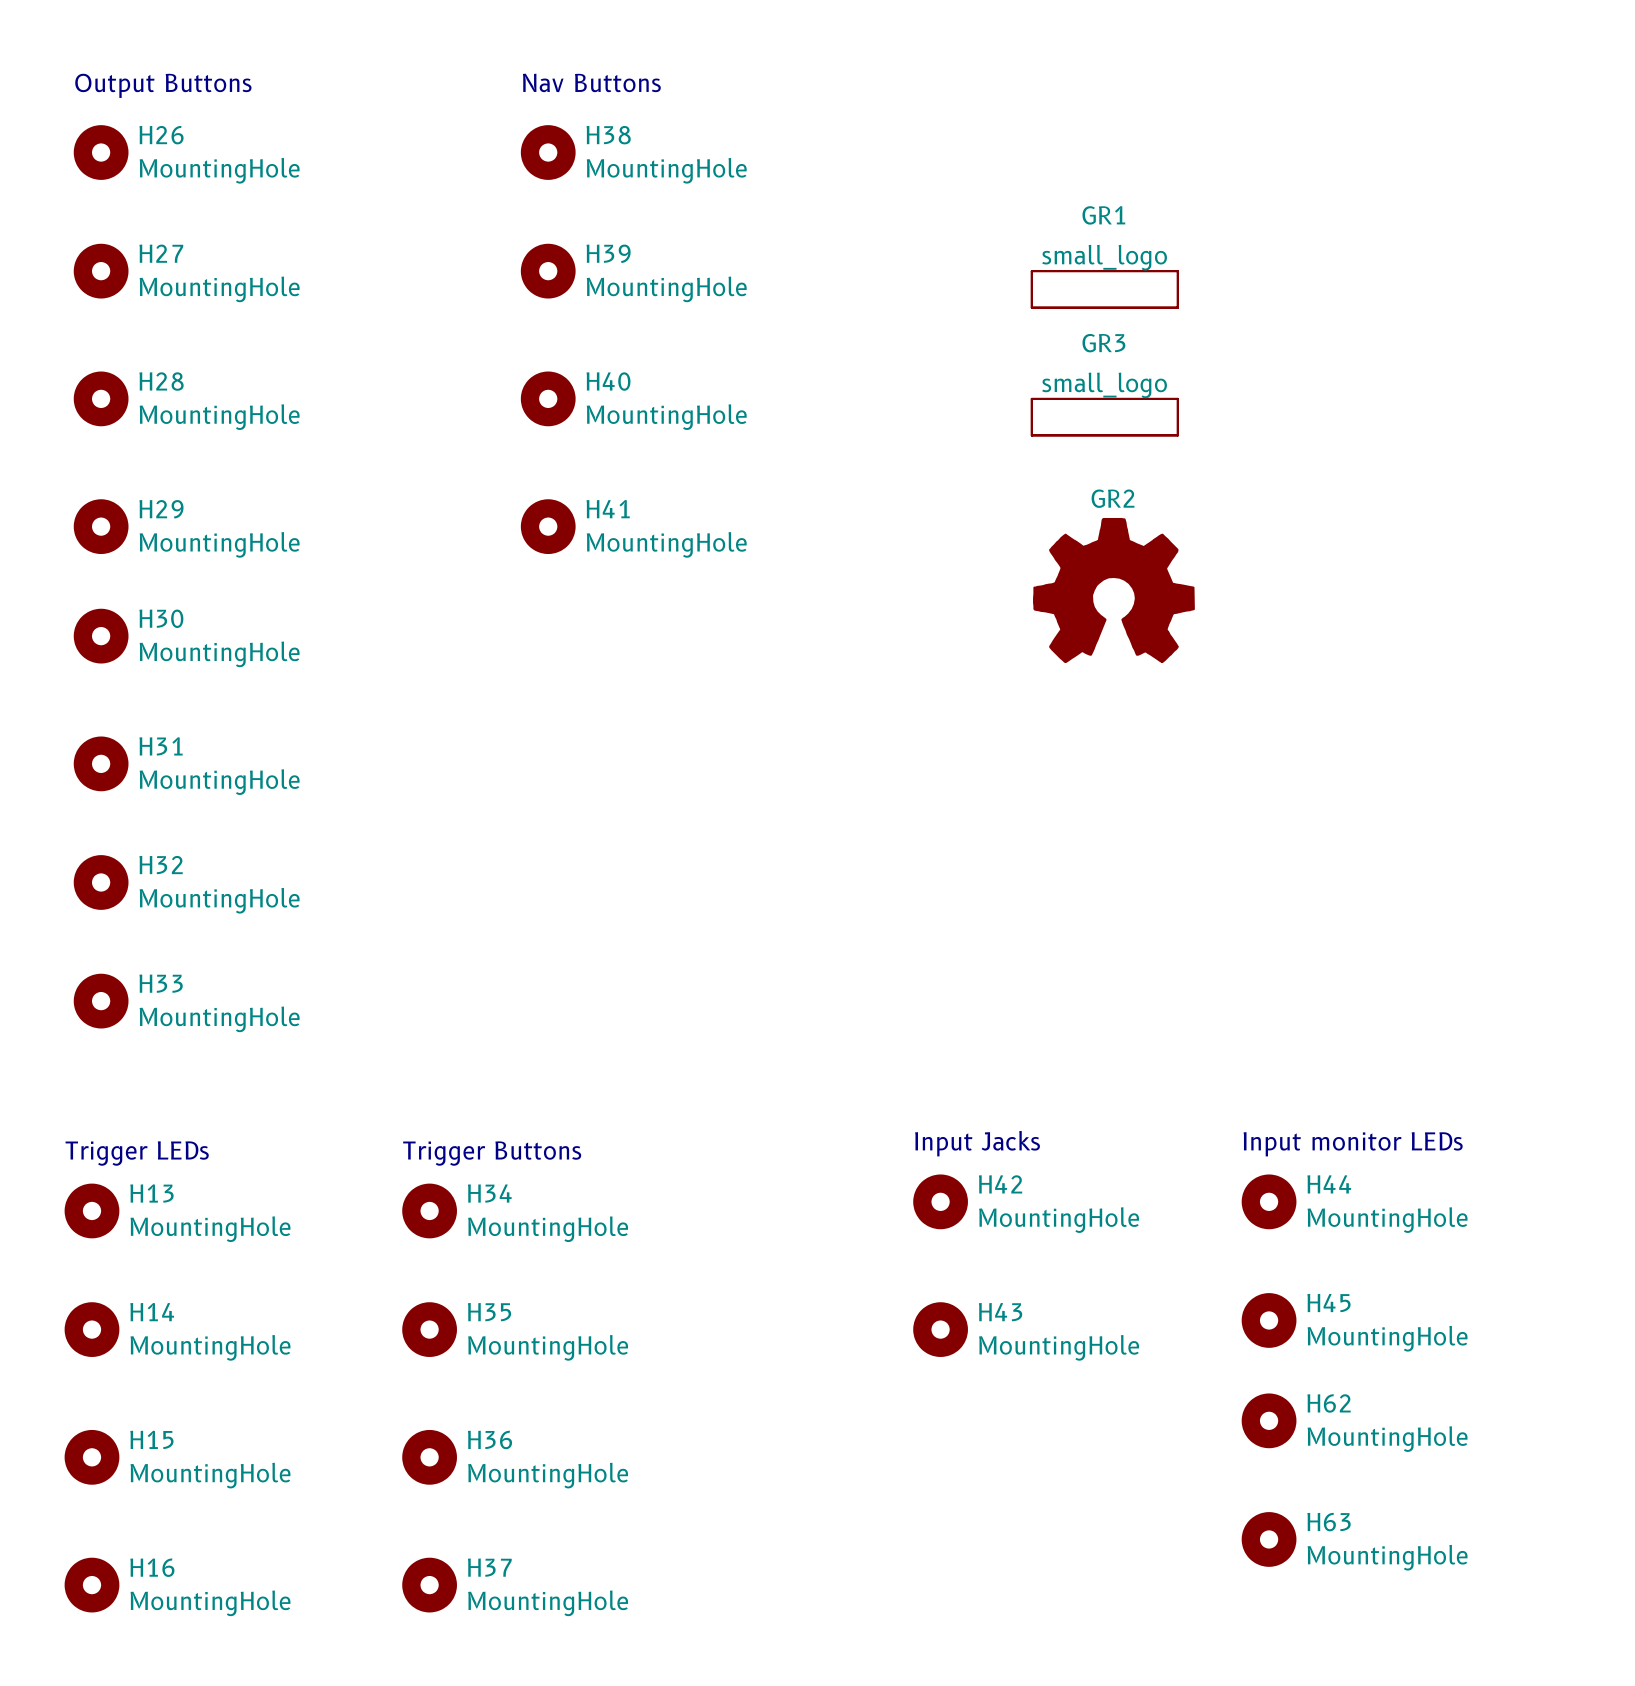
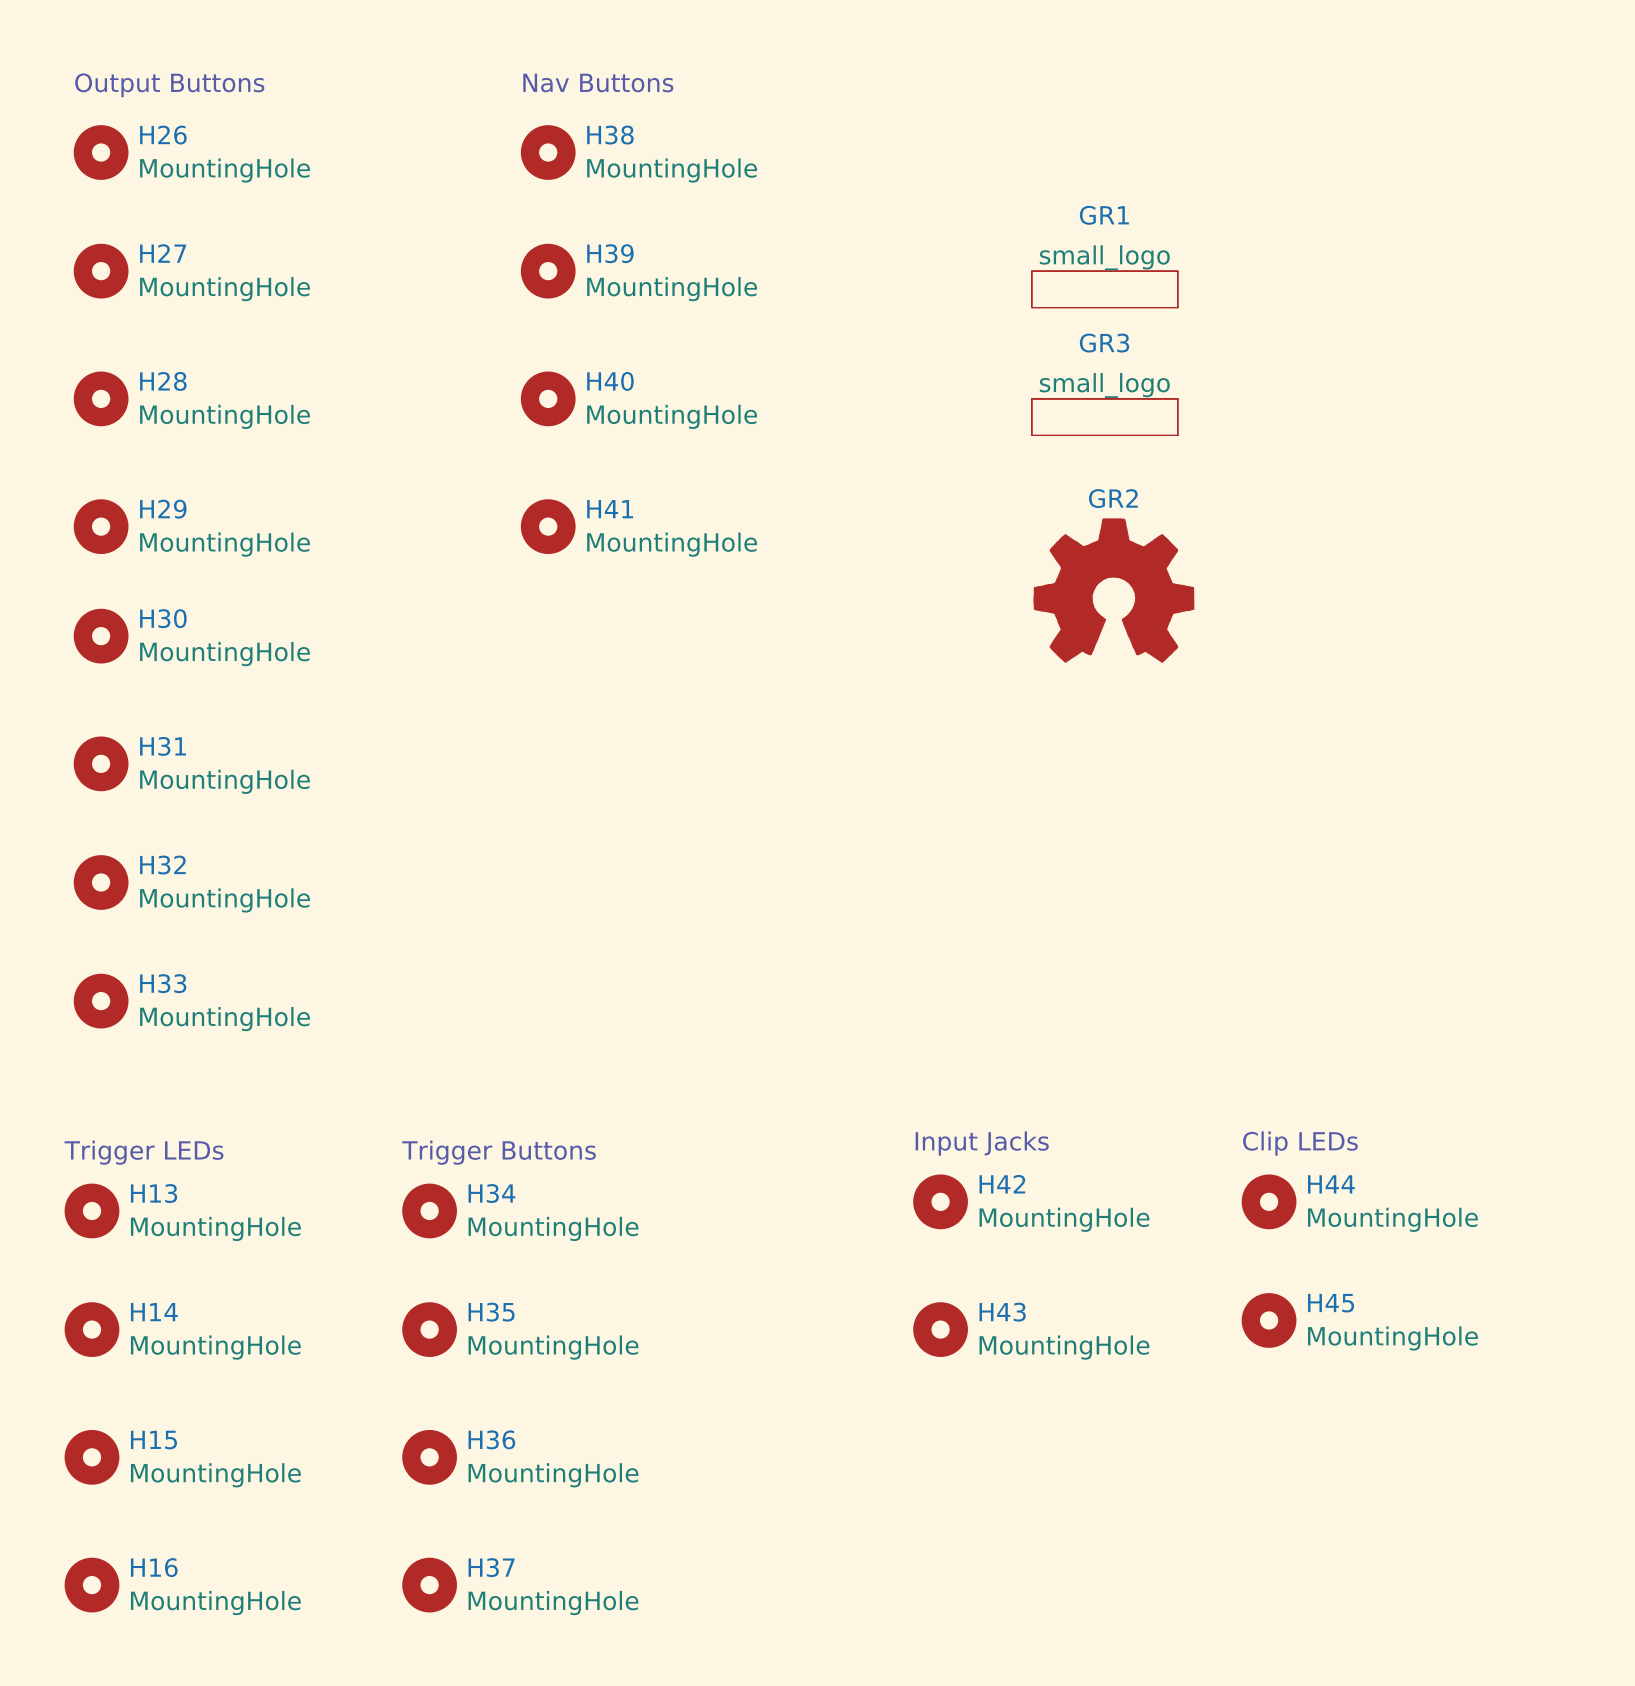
text: Input monitor LEDs (1353, 1144) -> Clip LEDs (1300, 1143)
H62: MountingHole (1269, 1420) -> none
H63: MountingHole (1269, 1539) -> none

